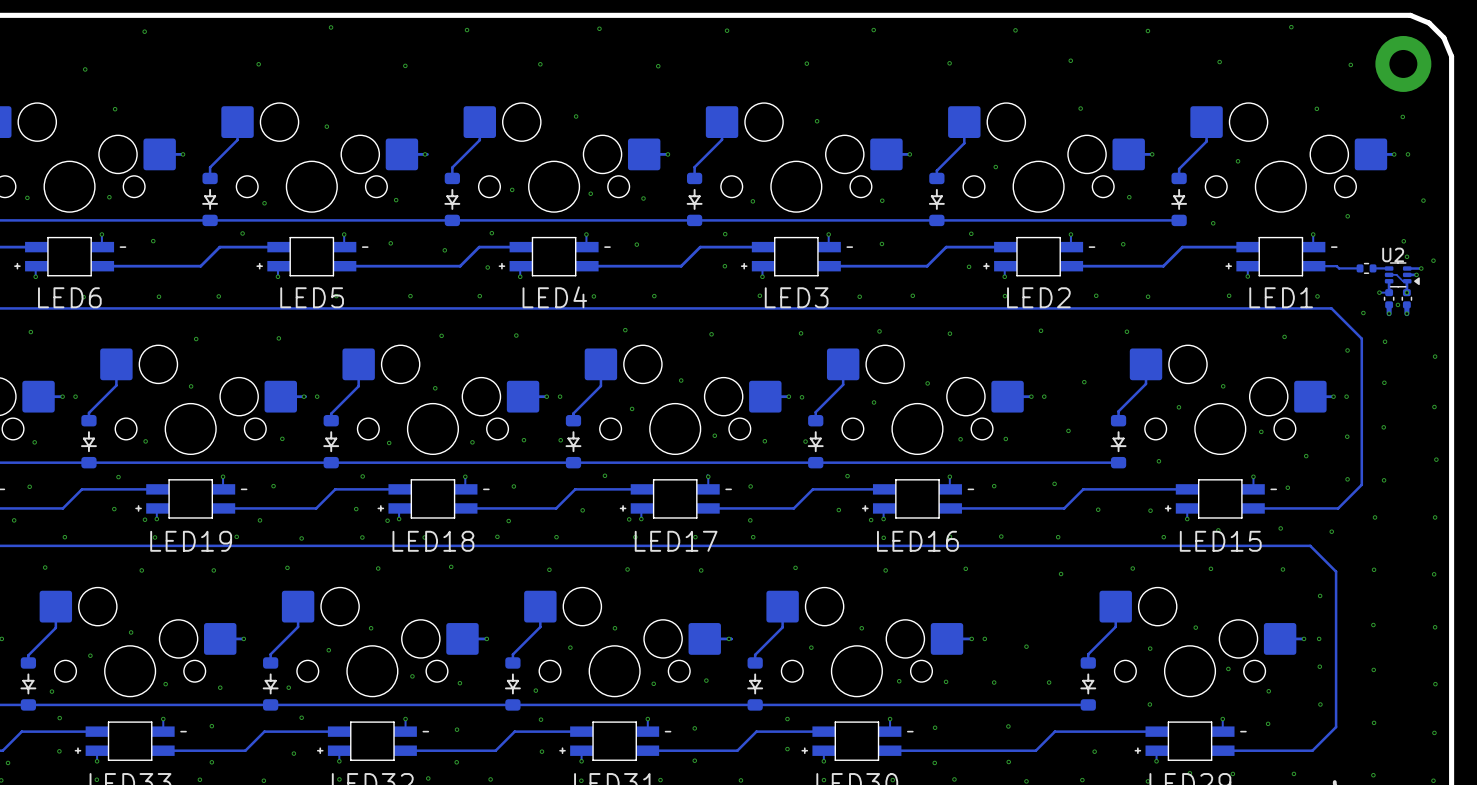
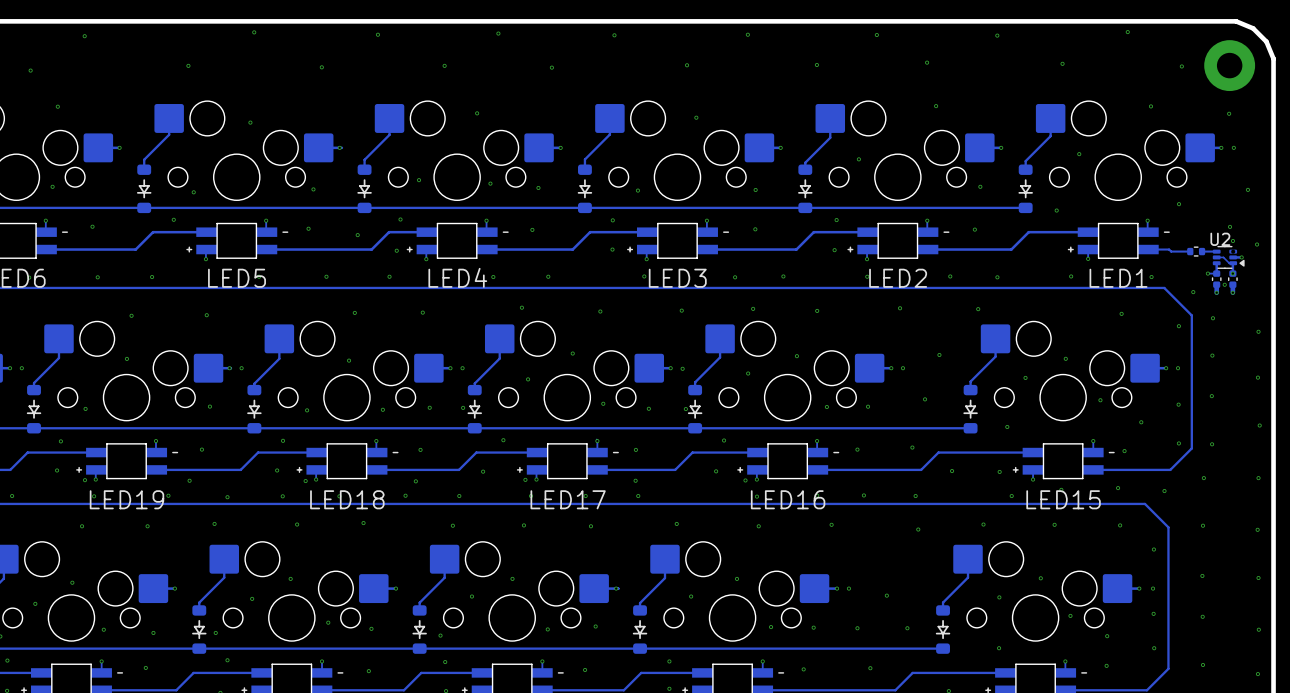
via: none -> (1233, 251)
track: (1421, 268) (1407, 268) -> none
via: (1421, 268) -> none

